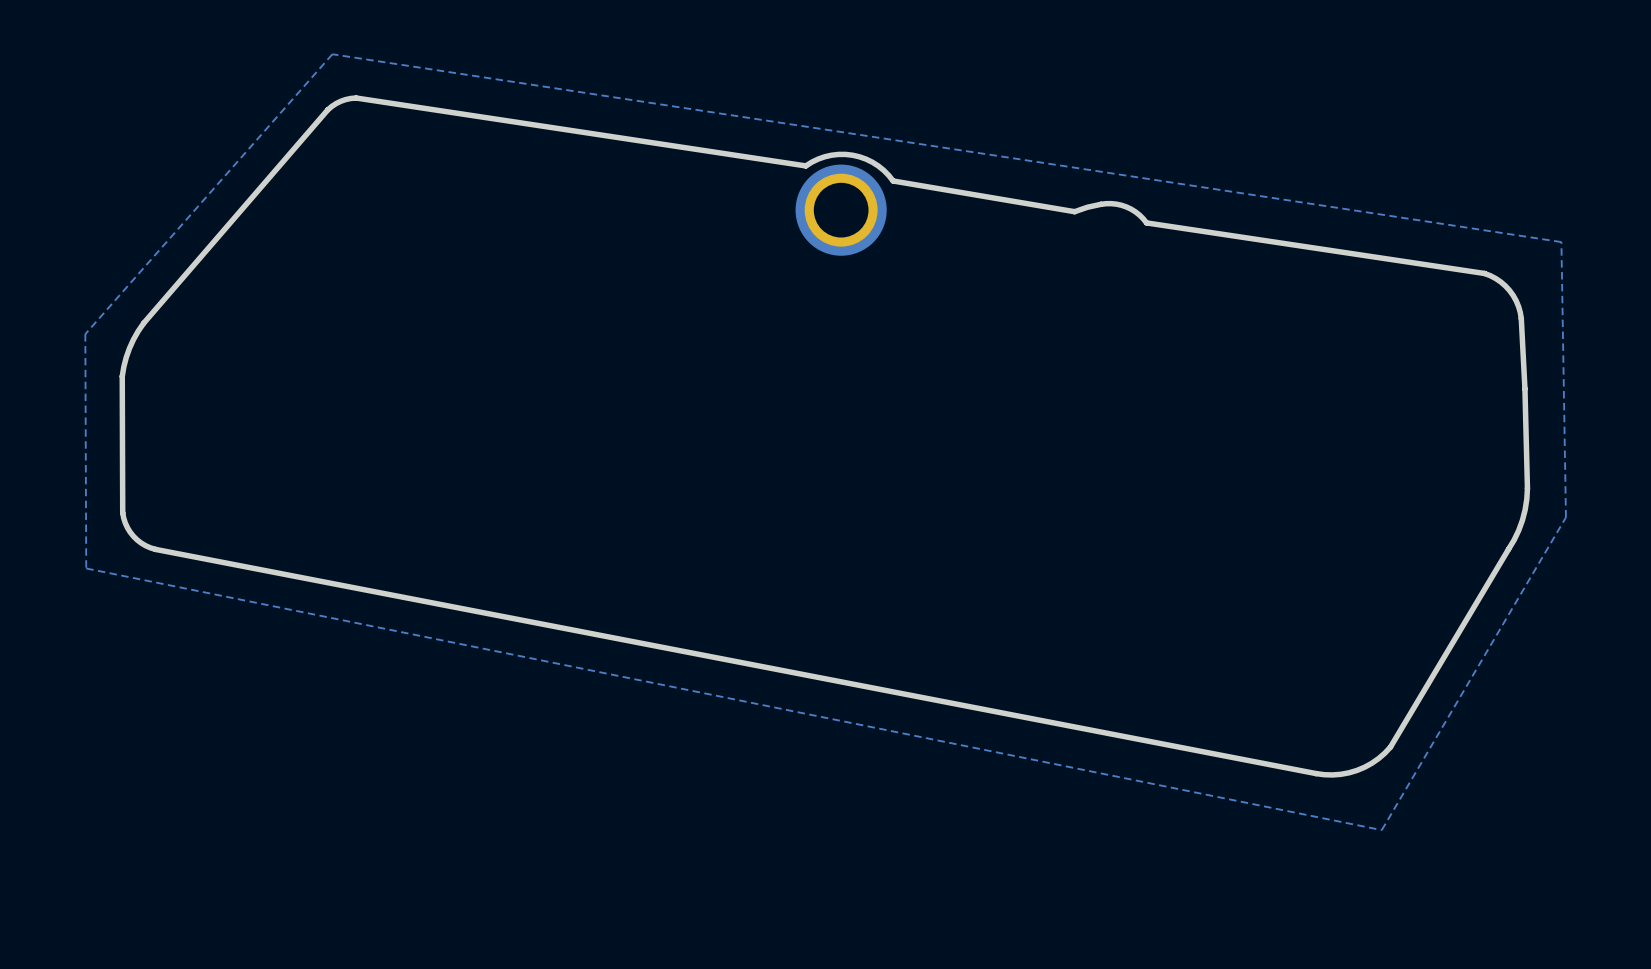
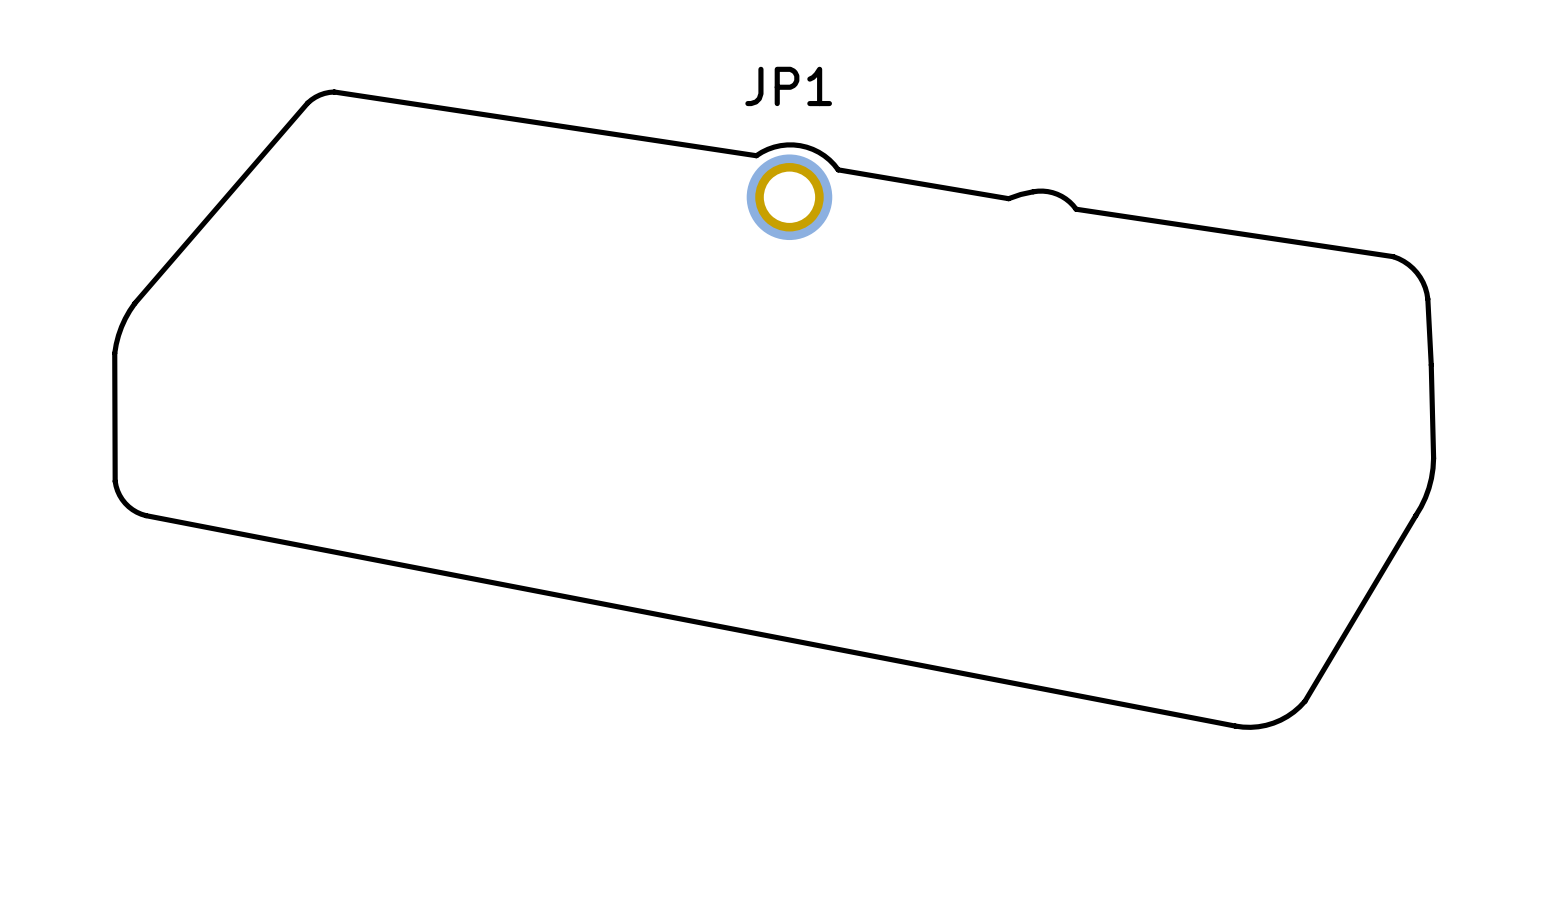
zone outline: (332, 54) (1561, 242) (1565, 517) (1381, 830) (86, 568) (85, 334) (332, 54) -> none
JP1 name: none -> JP1 (788, 86)

